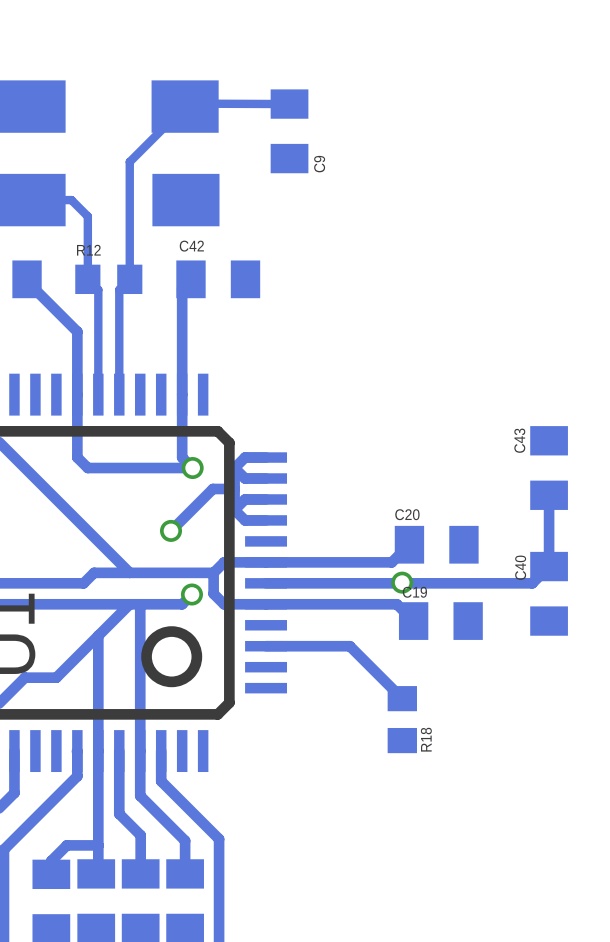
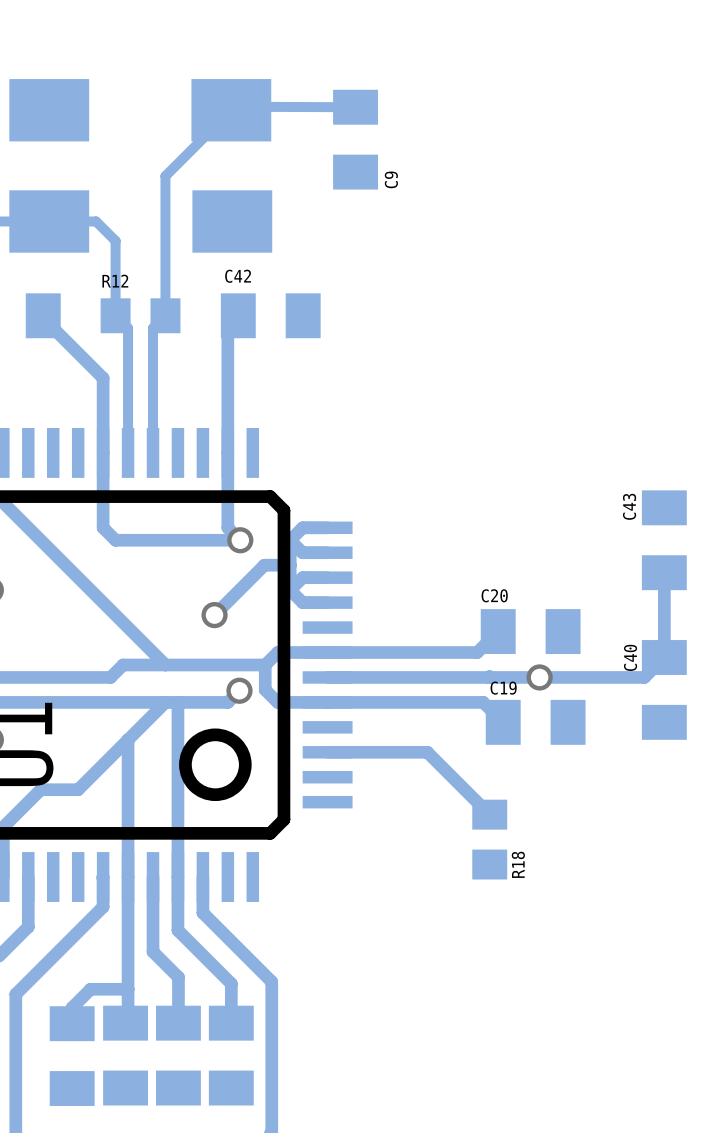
via position: (402, 582) -> (539, 677)

